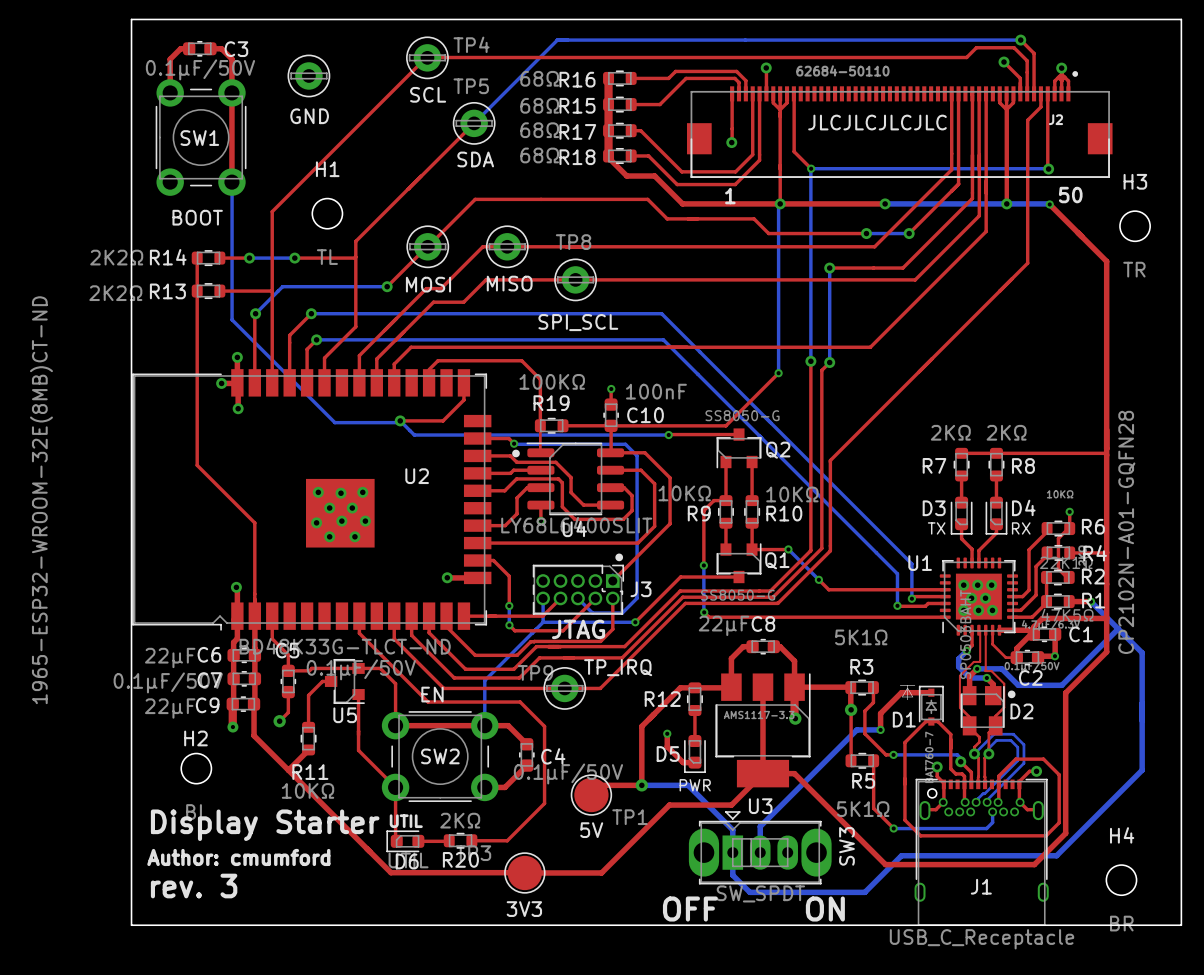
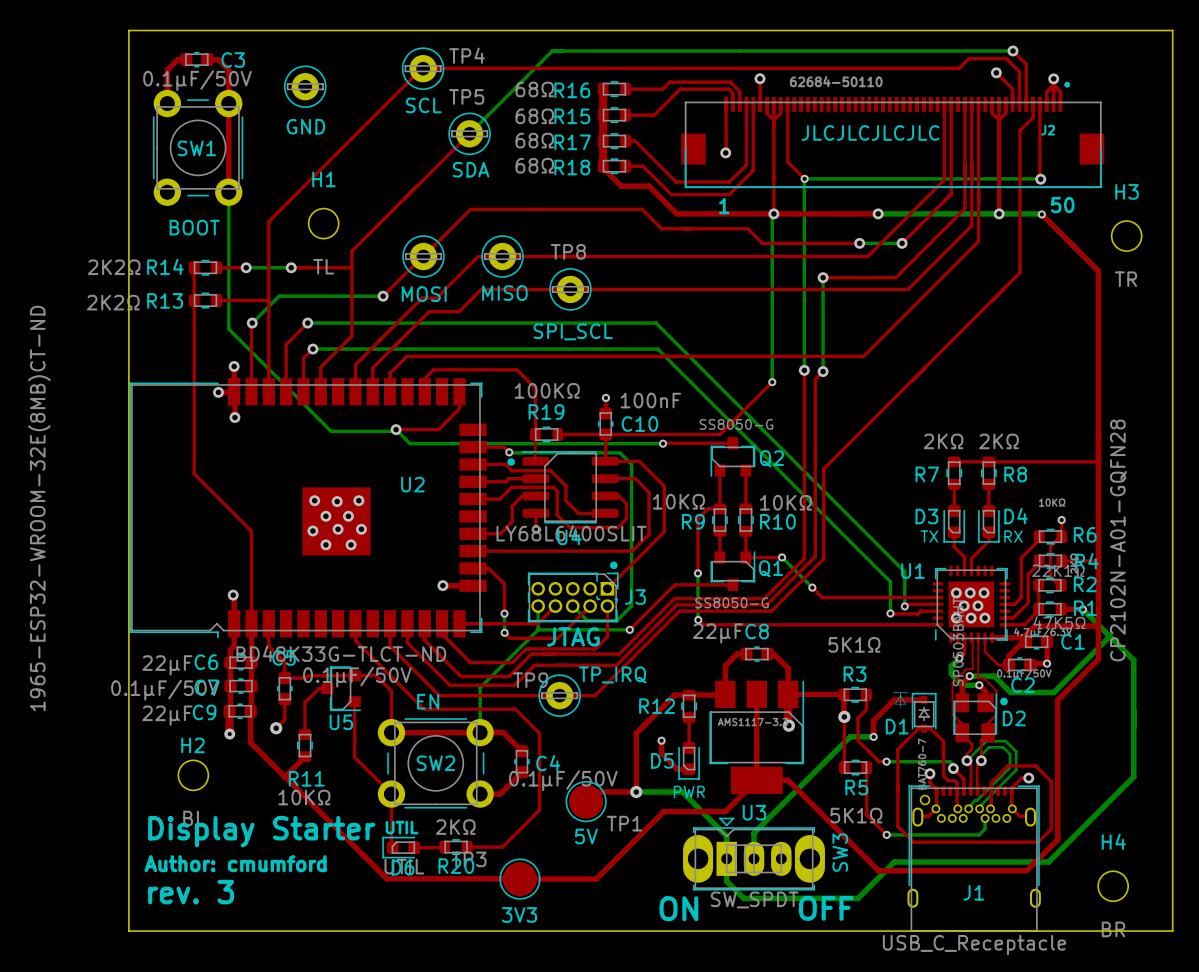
text position: OFF (690, 909) -> OFF (826, 908)
text position: ON (825, 909) -> ON (678, 908)

